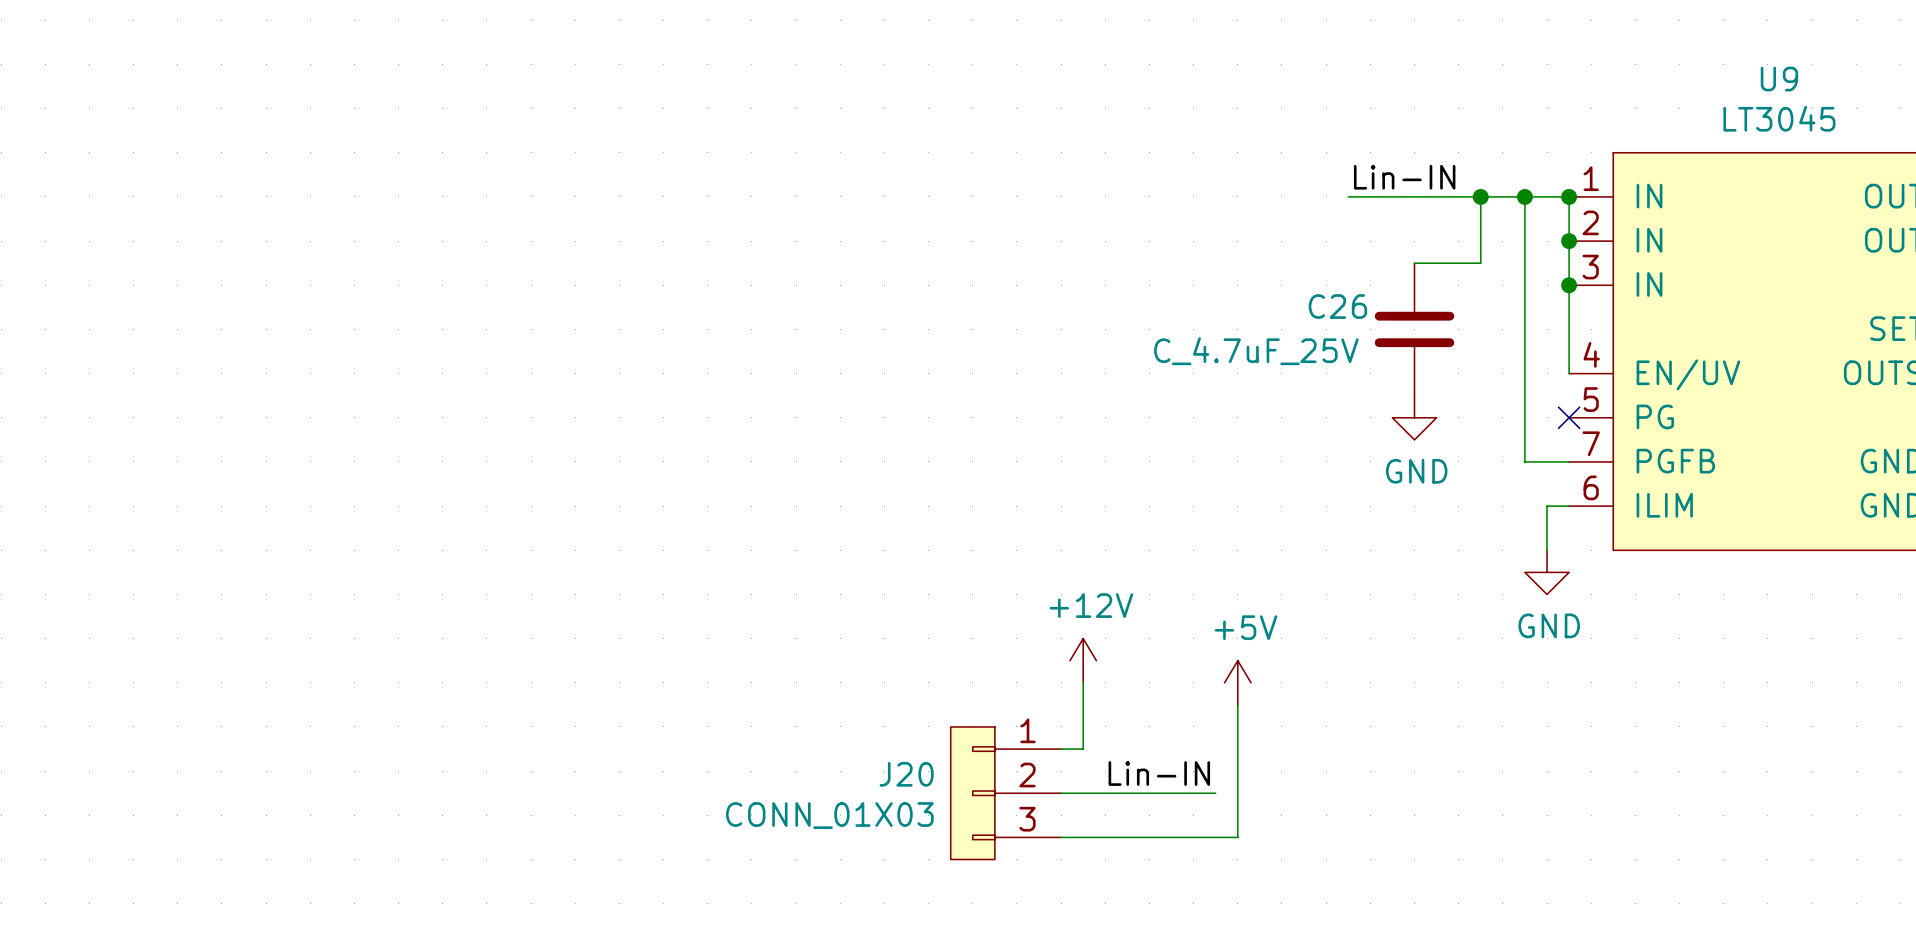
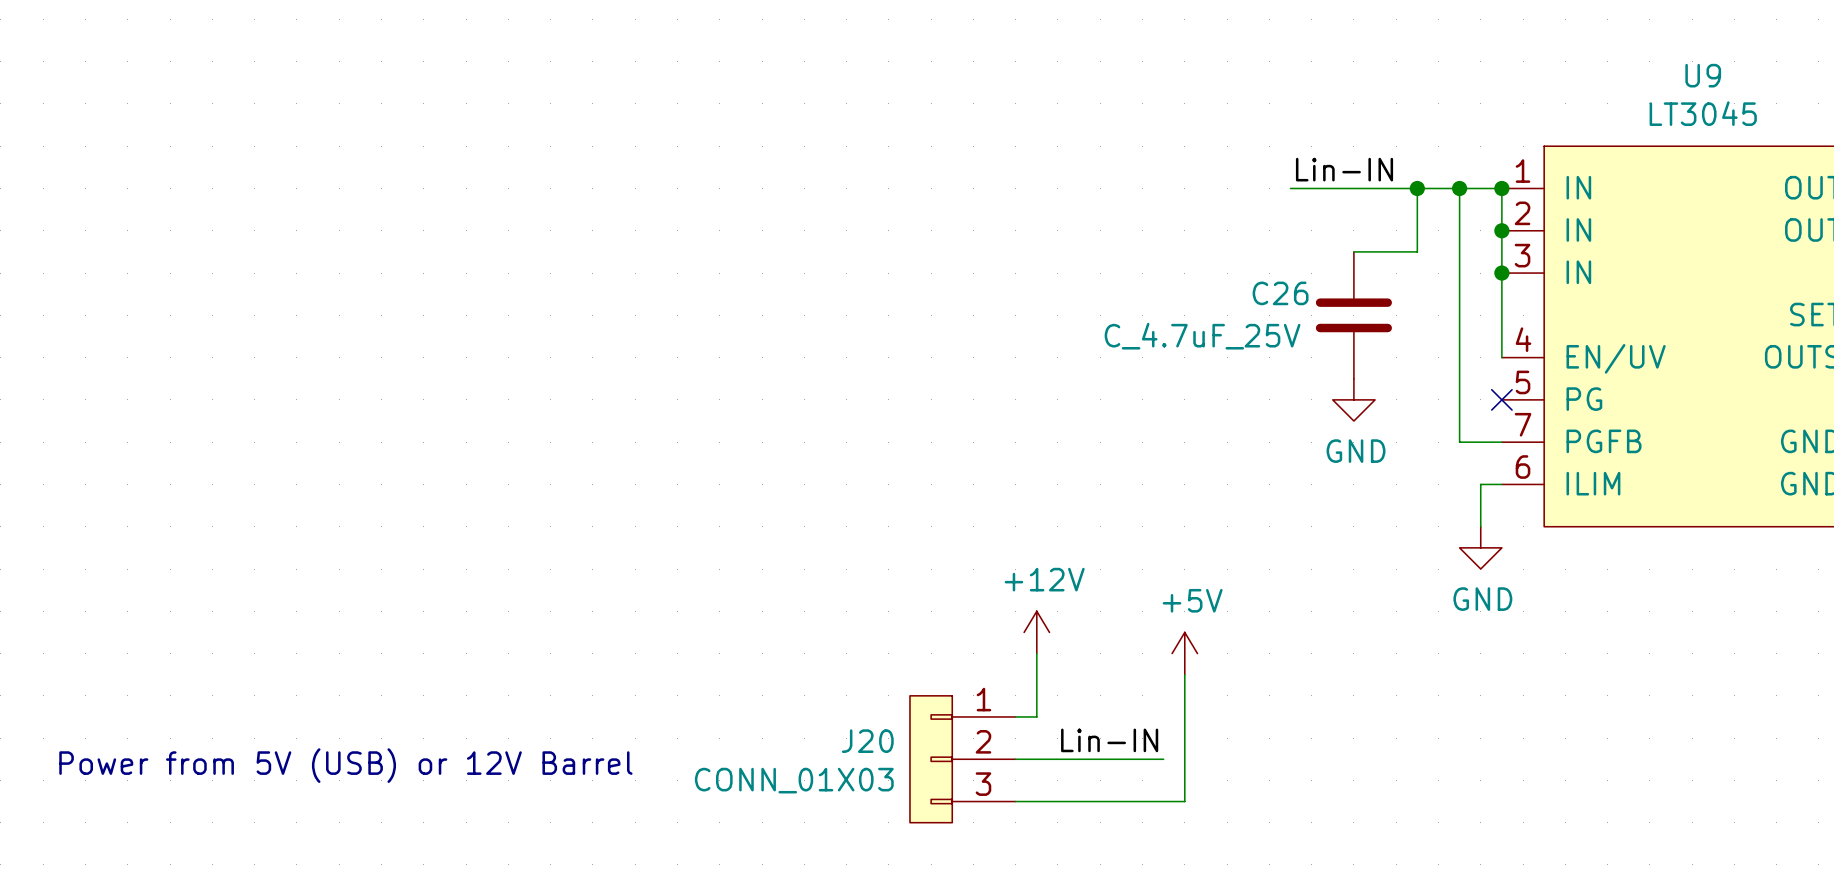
text: none -> Power from 5V (USB) or 12V Barrel (345, 765)

